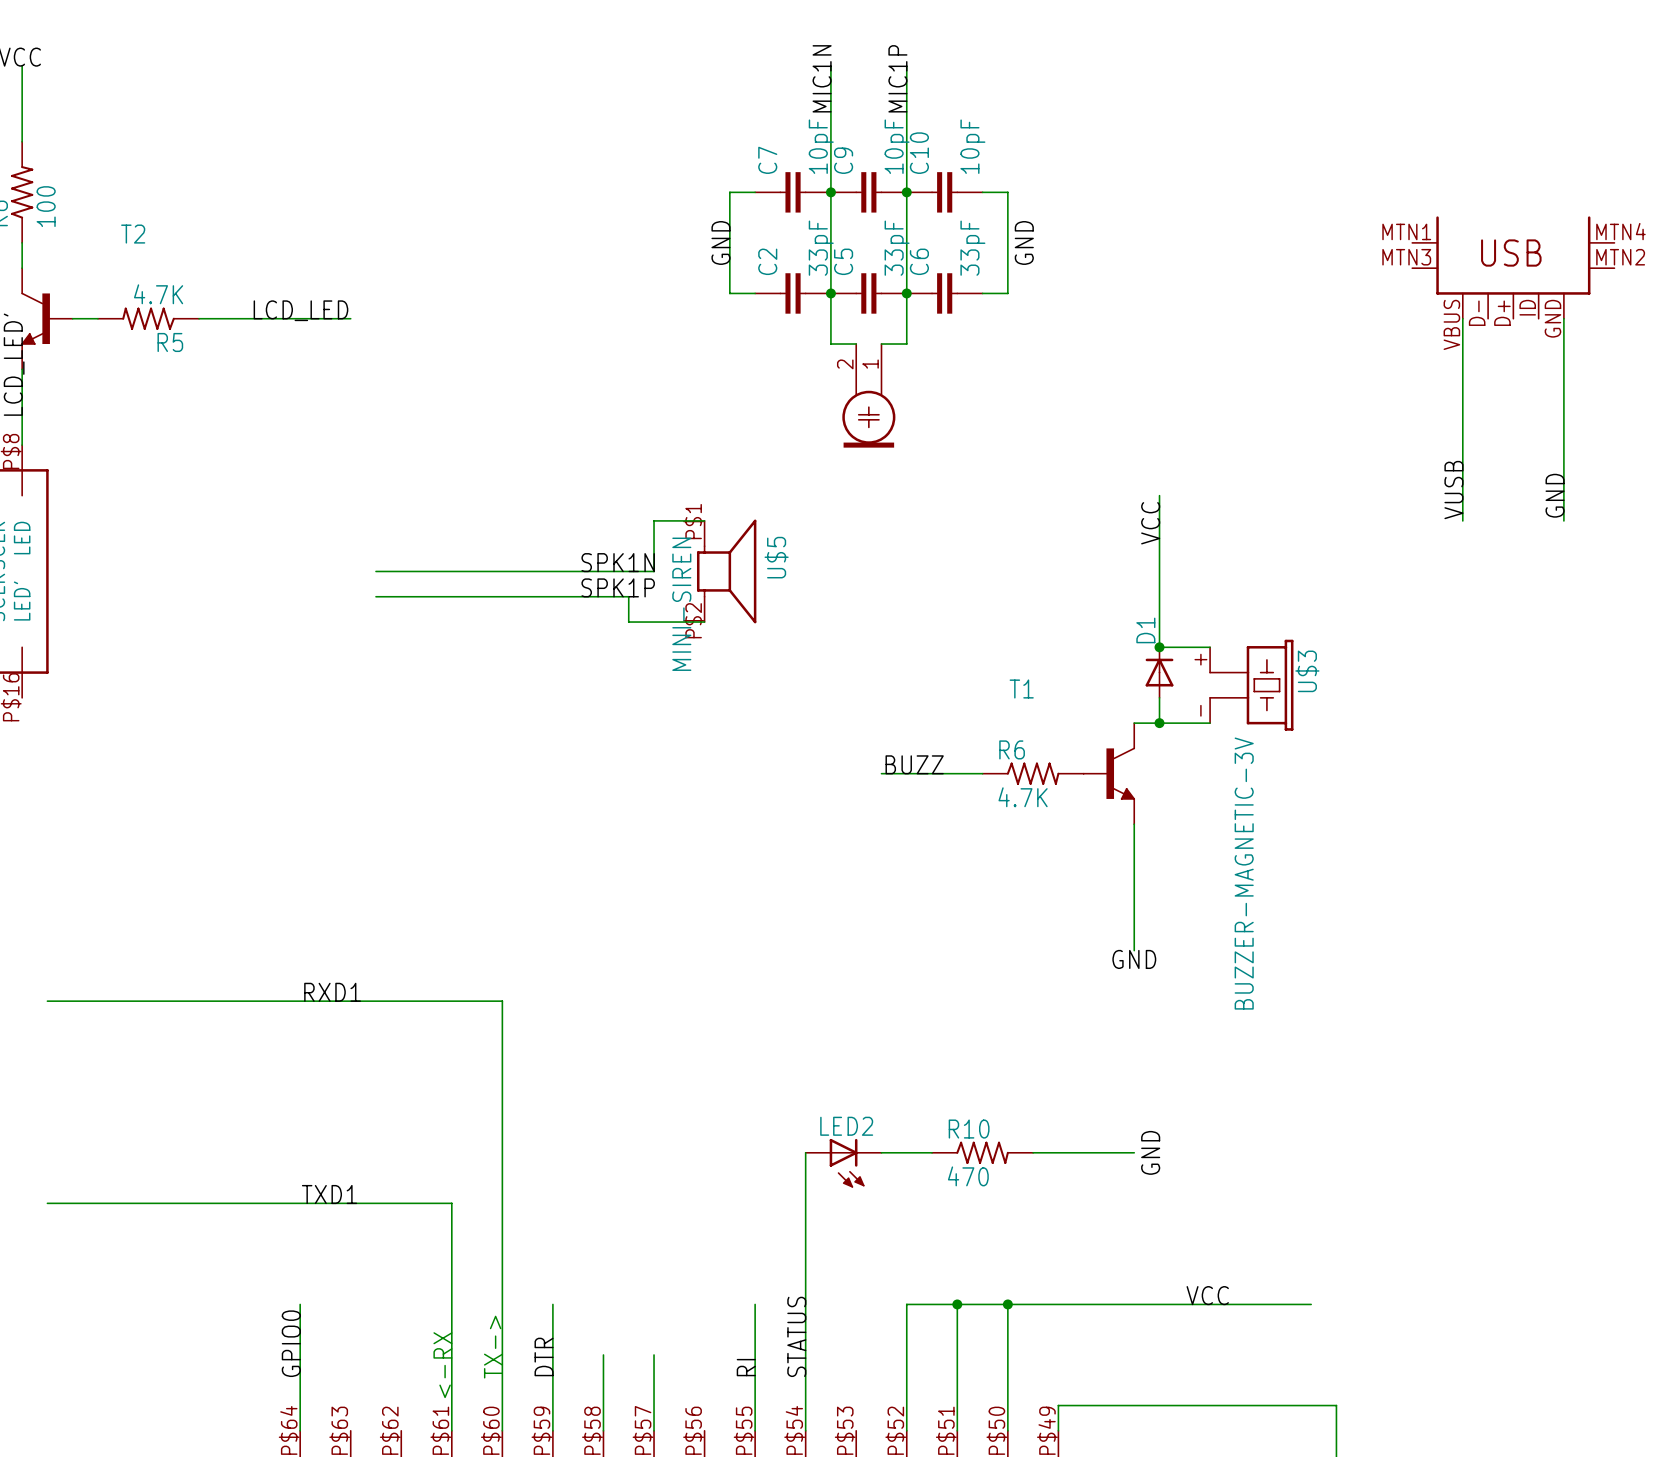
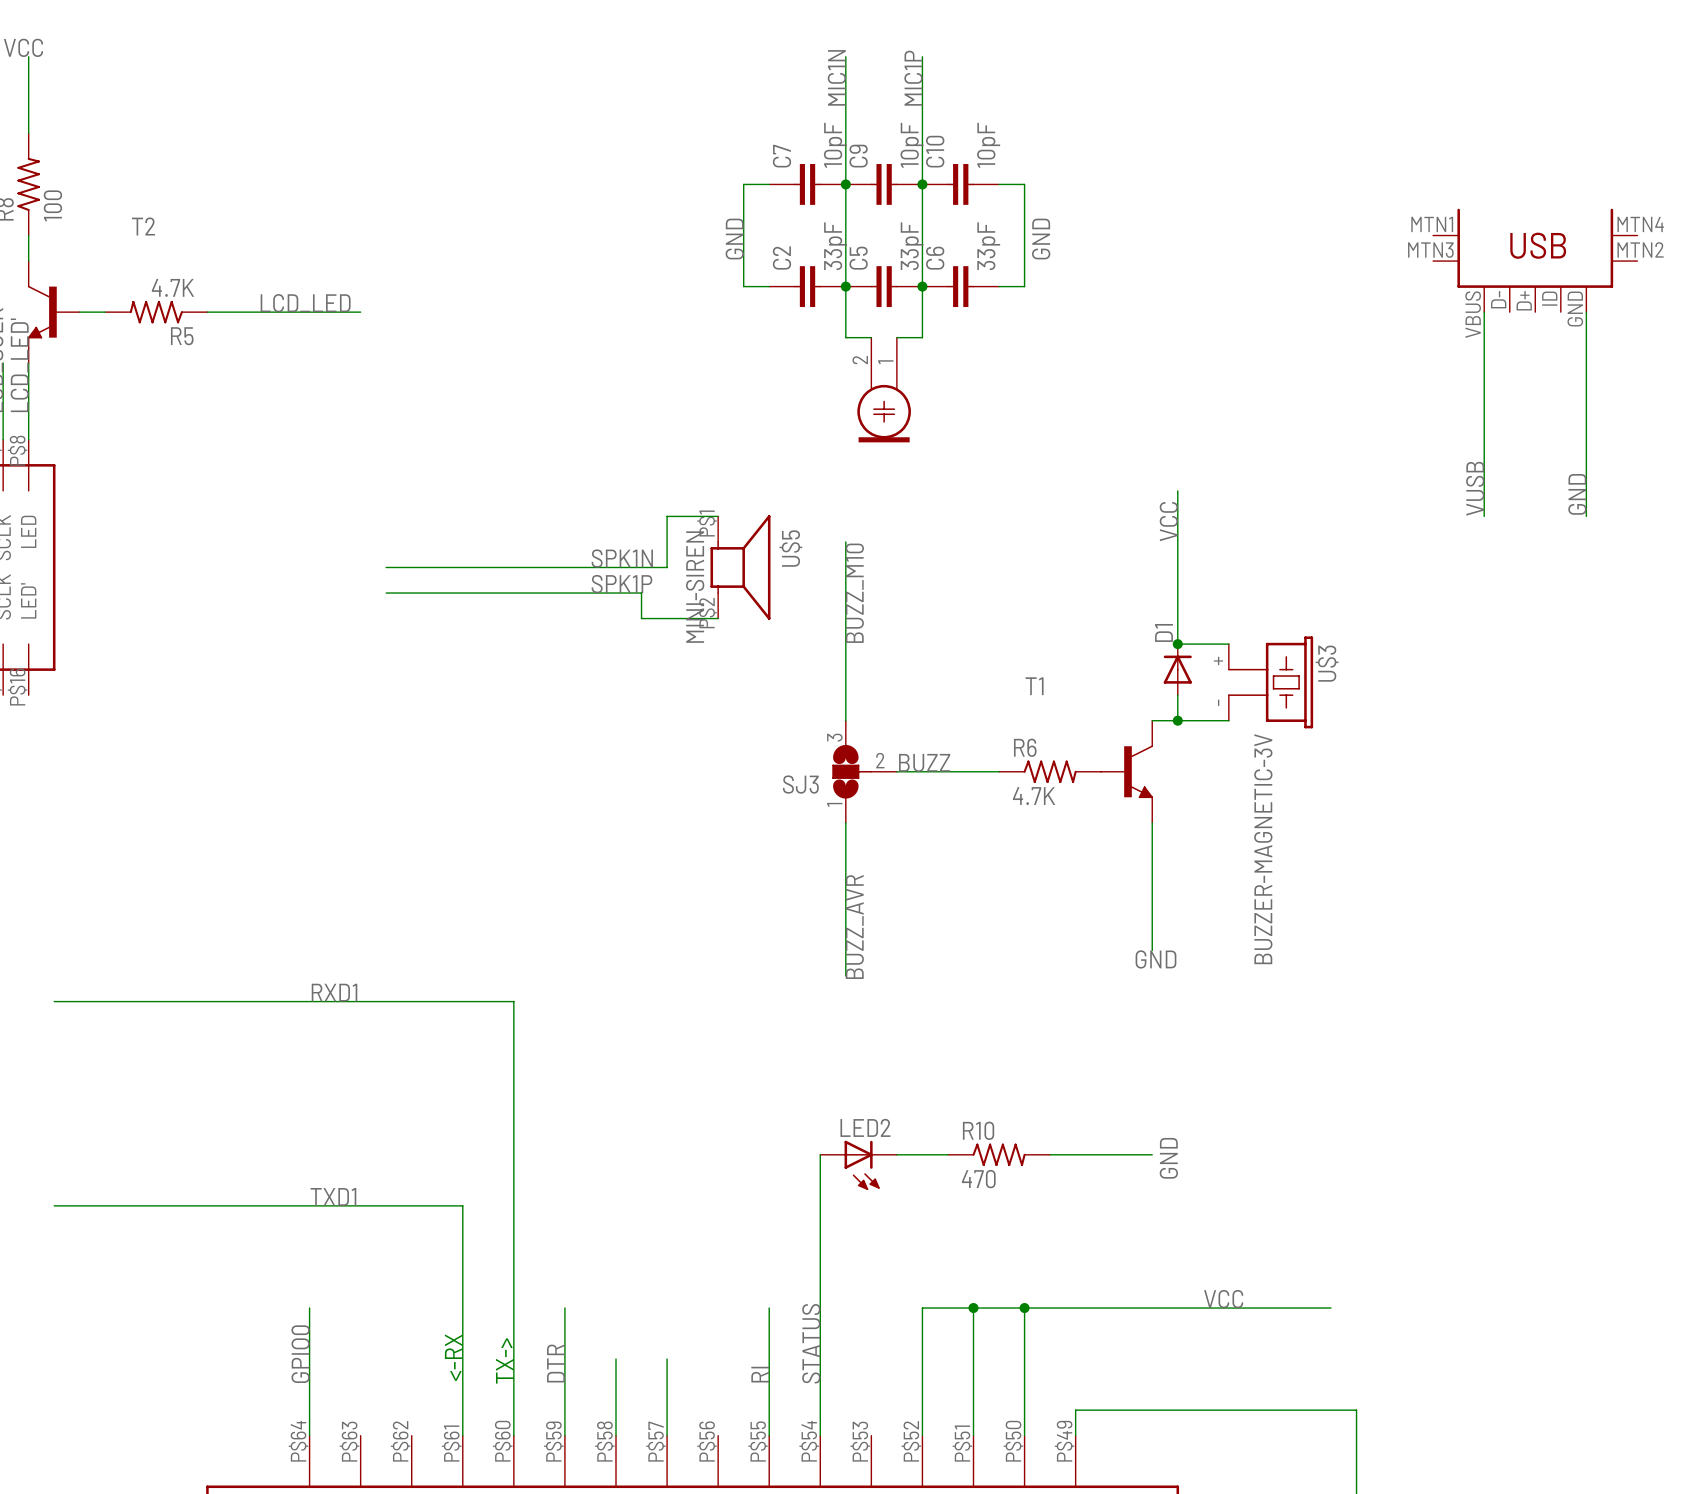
wire: none -> (845, 541) (845, 720)
label: none -> BUZZ_M10 (854, 593)
SJ3: none -> (864, 771)
wire: none -> (845, 822) (845, 976)
label: none -> BUZZ_AVR (854, 927)

